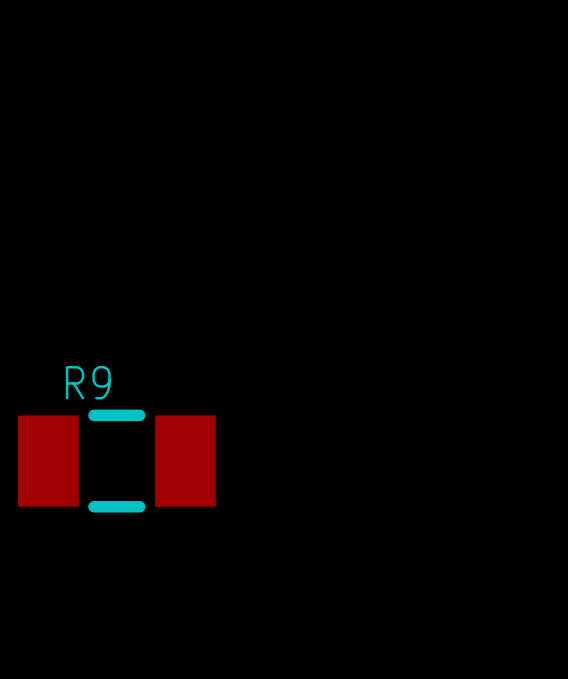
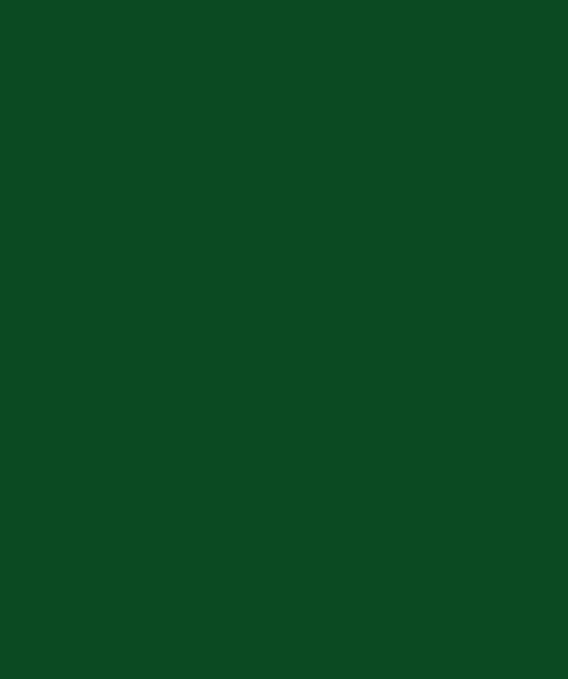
R9: (116, 461) -> none

